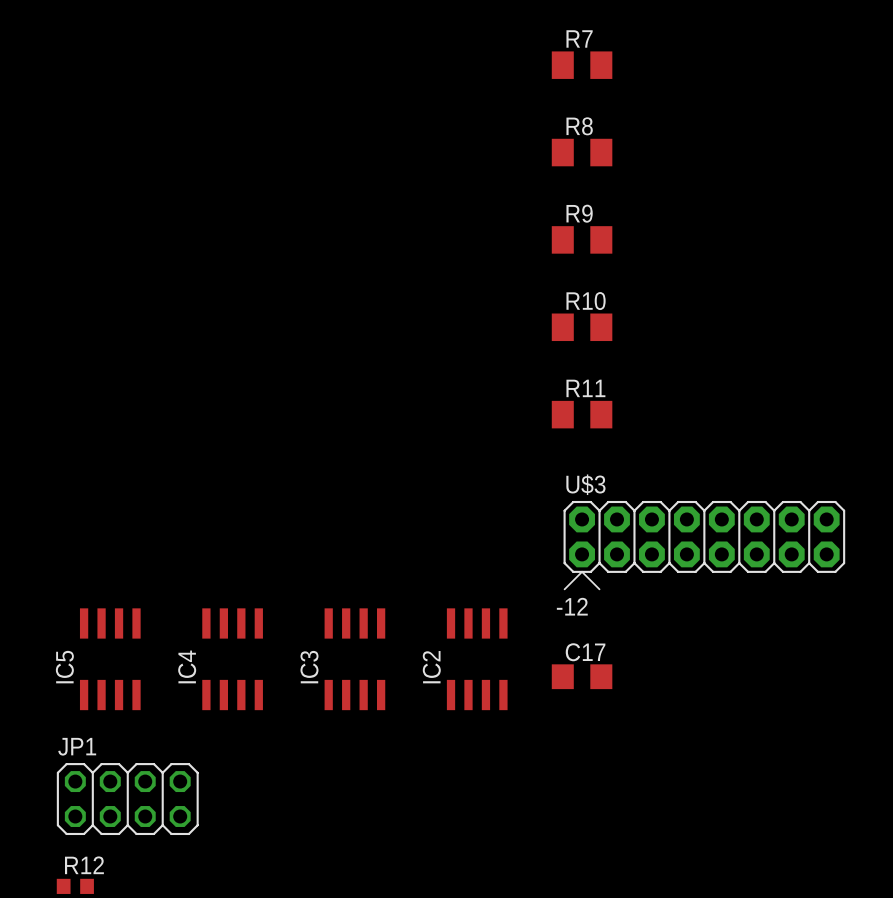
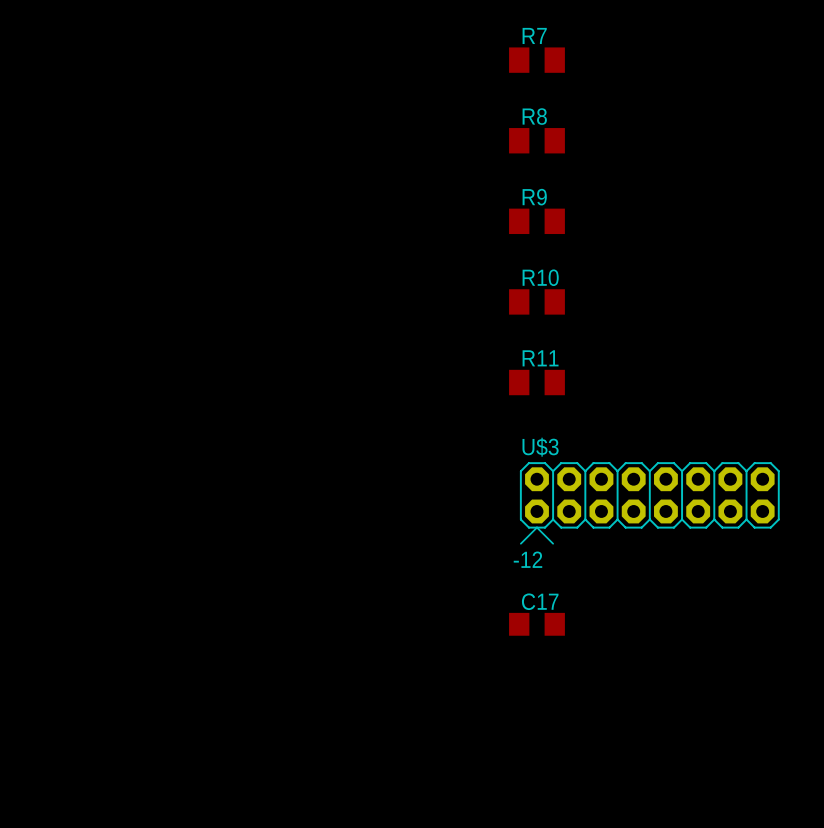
IC5: (110, 659) -> none
IC4: (232, 659) -> none
IC3: (354, 659) -> none
IC2: (477, 659) -> none
JP1: (127, 799) -> none
R12: (75, 886) -> none

